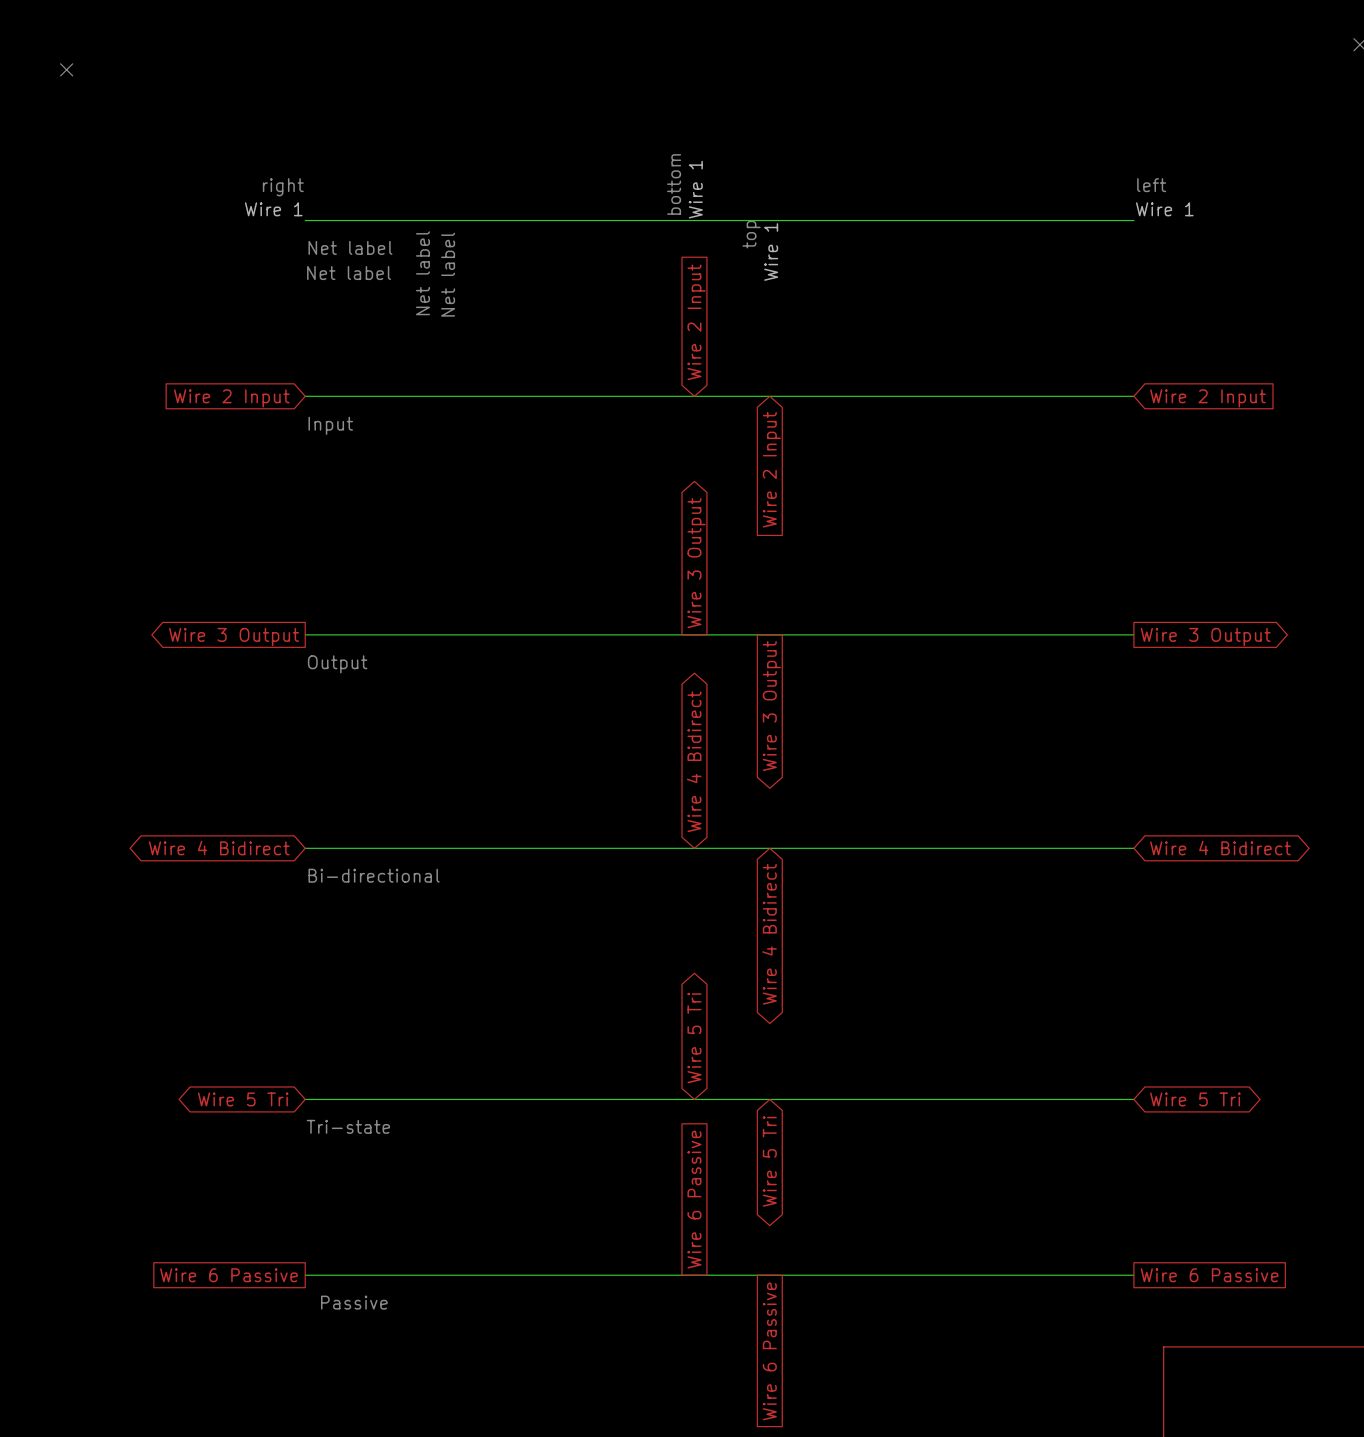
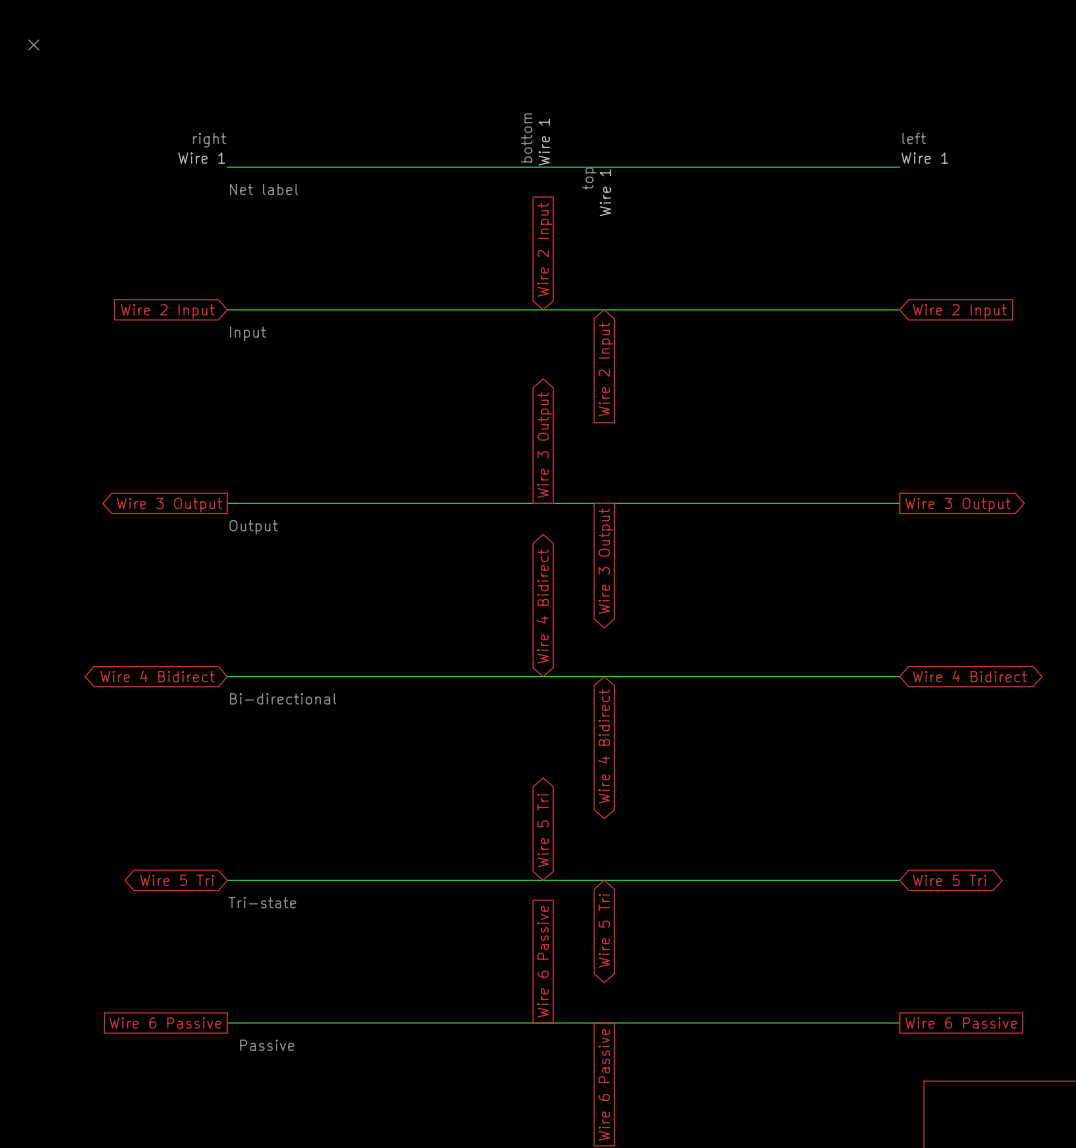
text: Net label (349, 273) -> none
text: Net label (422, 273) -> none
text: Net label (448, 274) -> none

